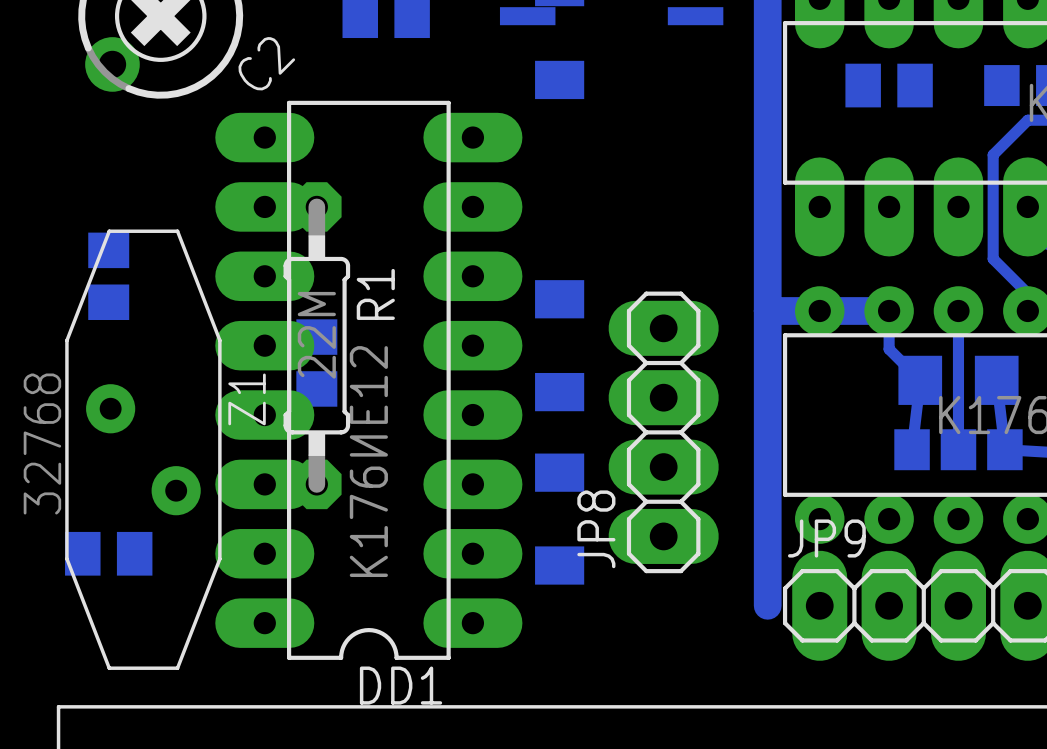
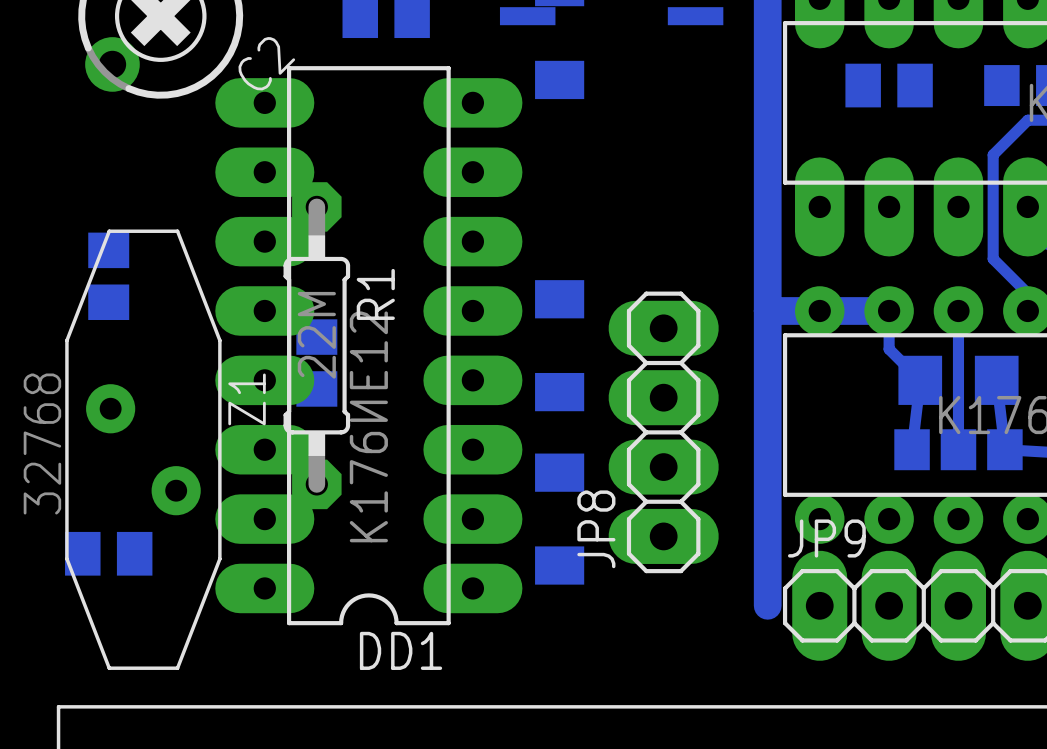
DD1 position: (368, 380) -> (368, 345)

